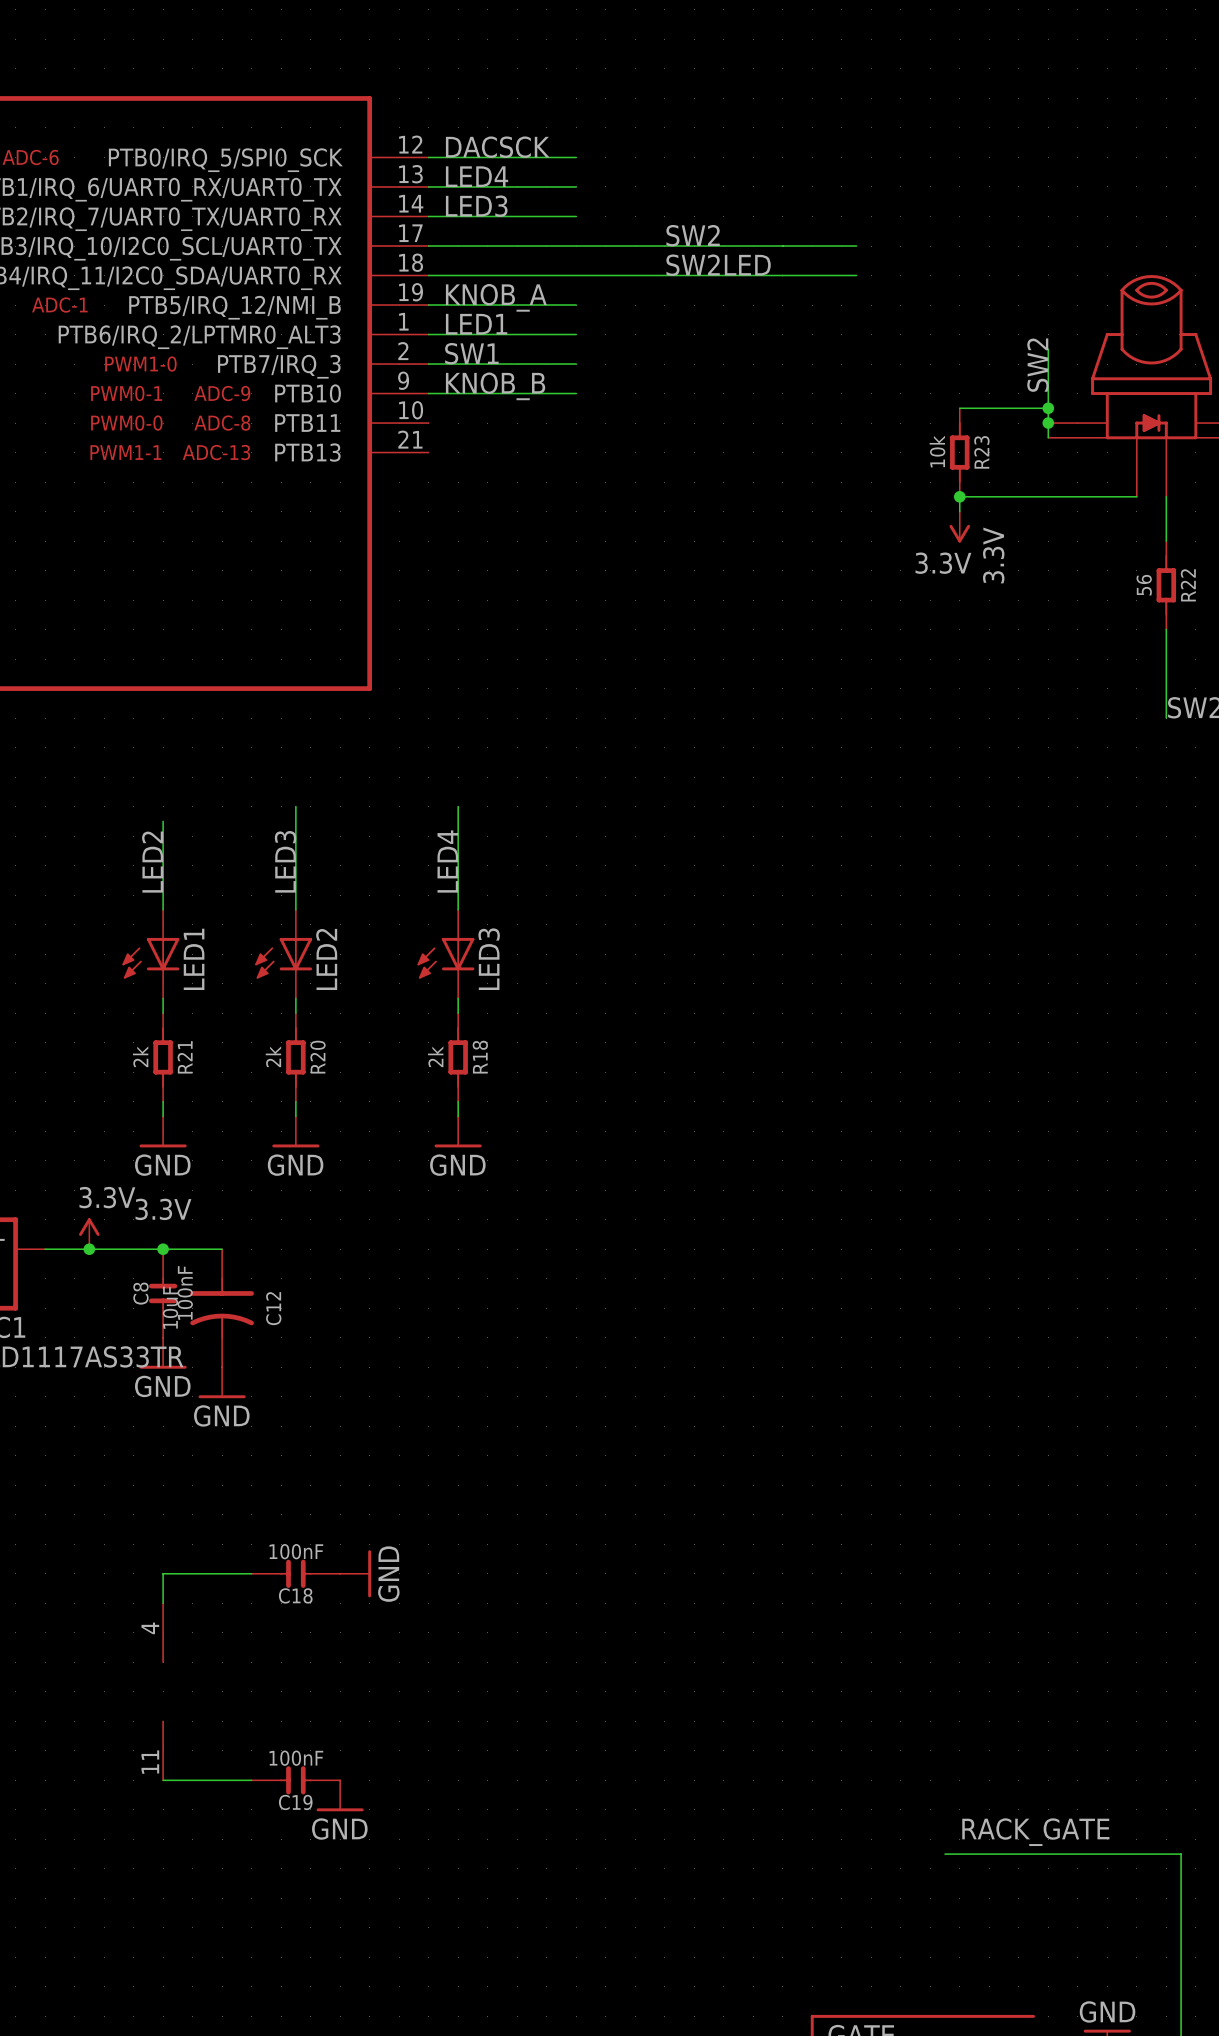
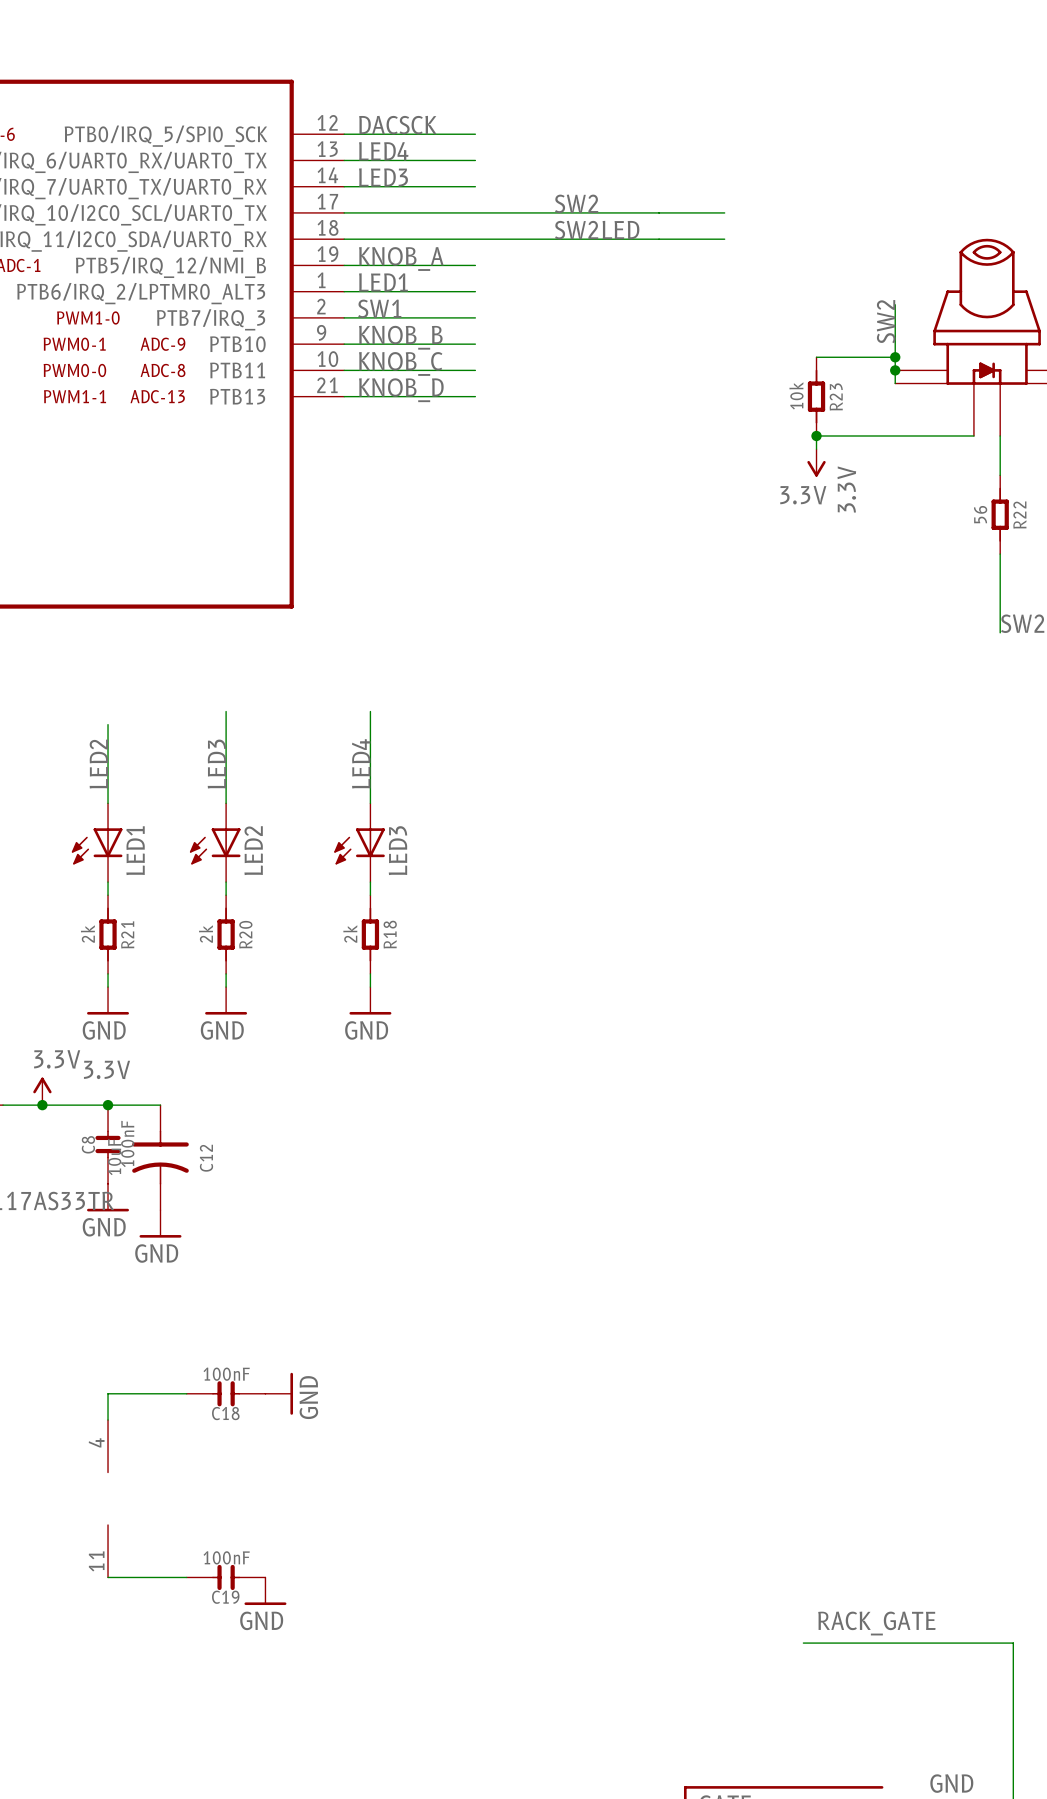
label: none -> KNOB_C (400, 363)
wire: none -> (344, 370) (475, 370)
label: none -> KNOB_D (401, 390)
wire: none -> (344, 396) (475, 396)

